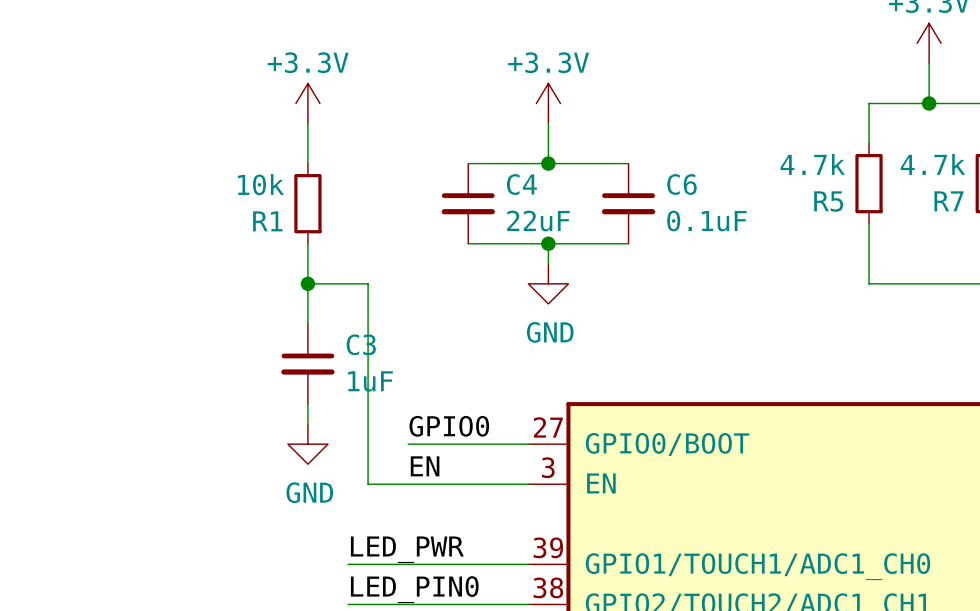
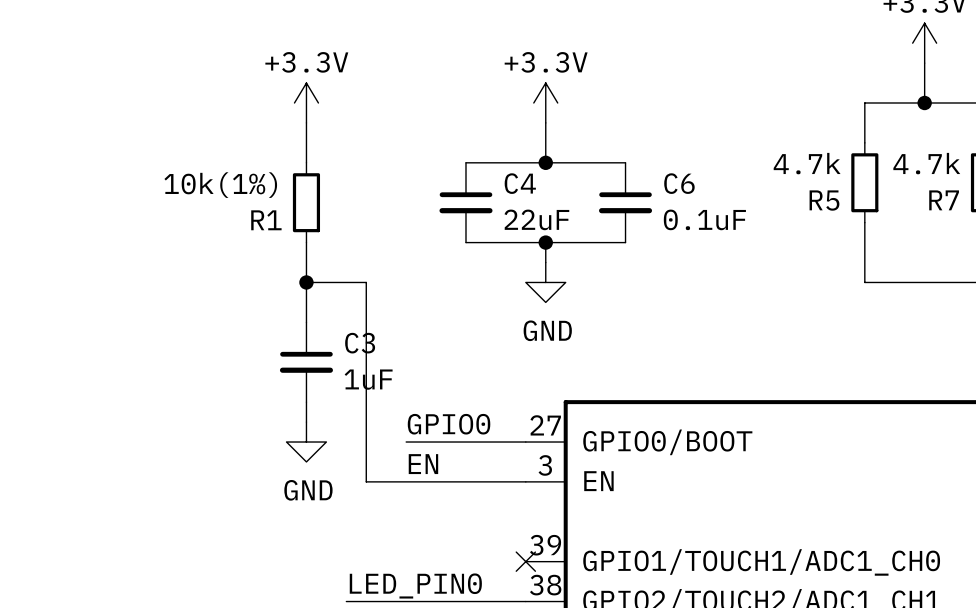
R1 value: 10k (260, 184) -> 10k(1%) (220, 185)
label: LED_PWR (407, 549) -> none
wire: (348, 564) (528, 564) -> none
no-connect mark: none -> (525, 561)

